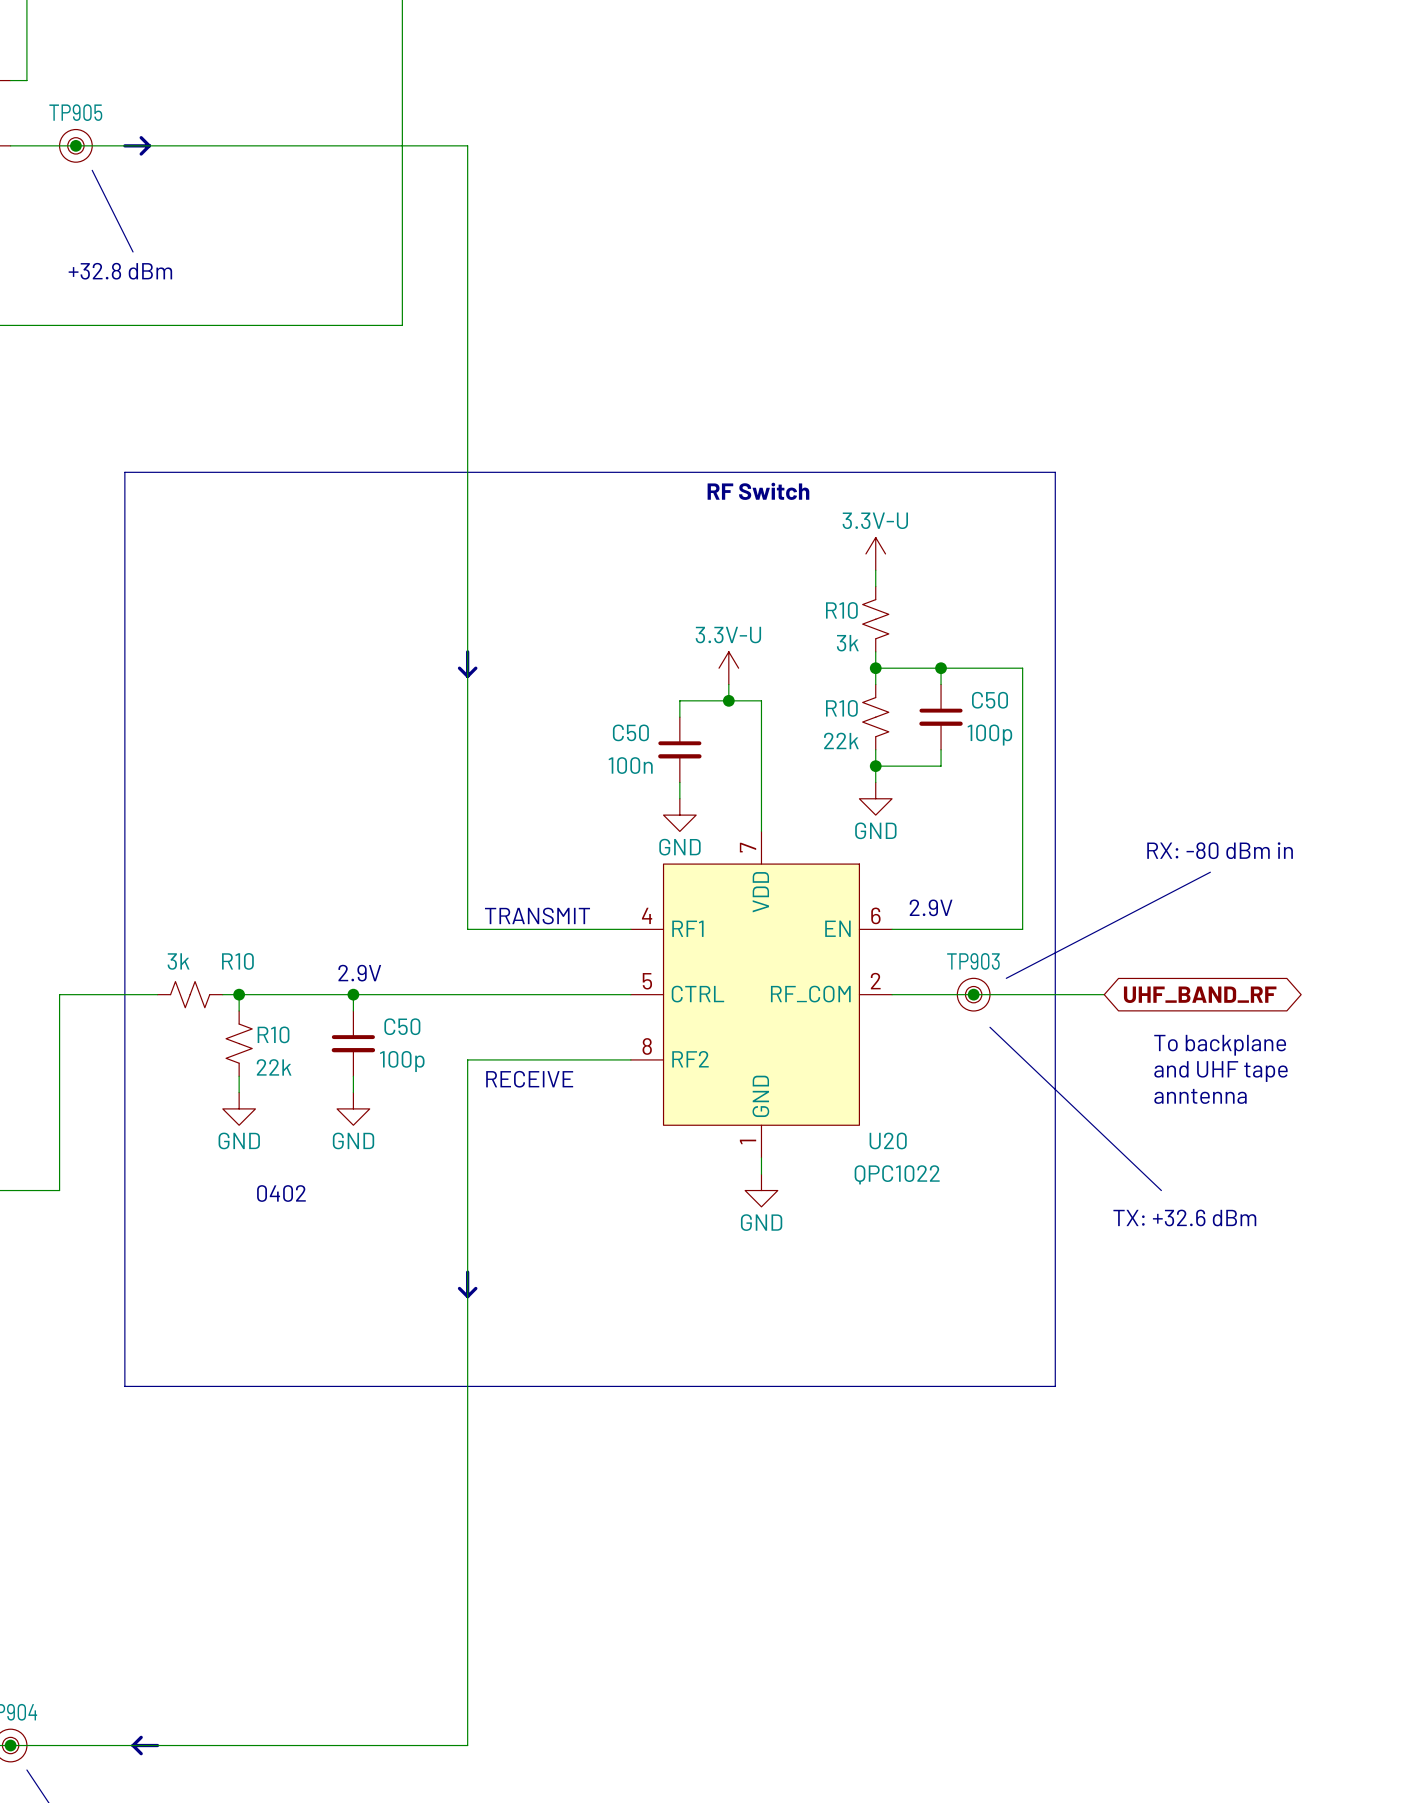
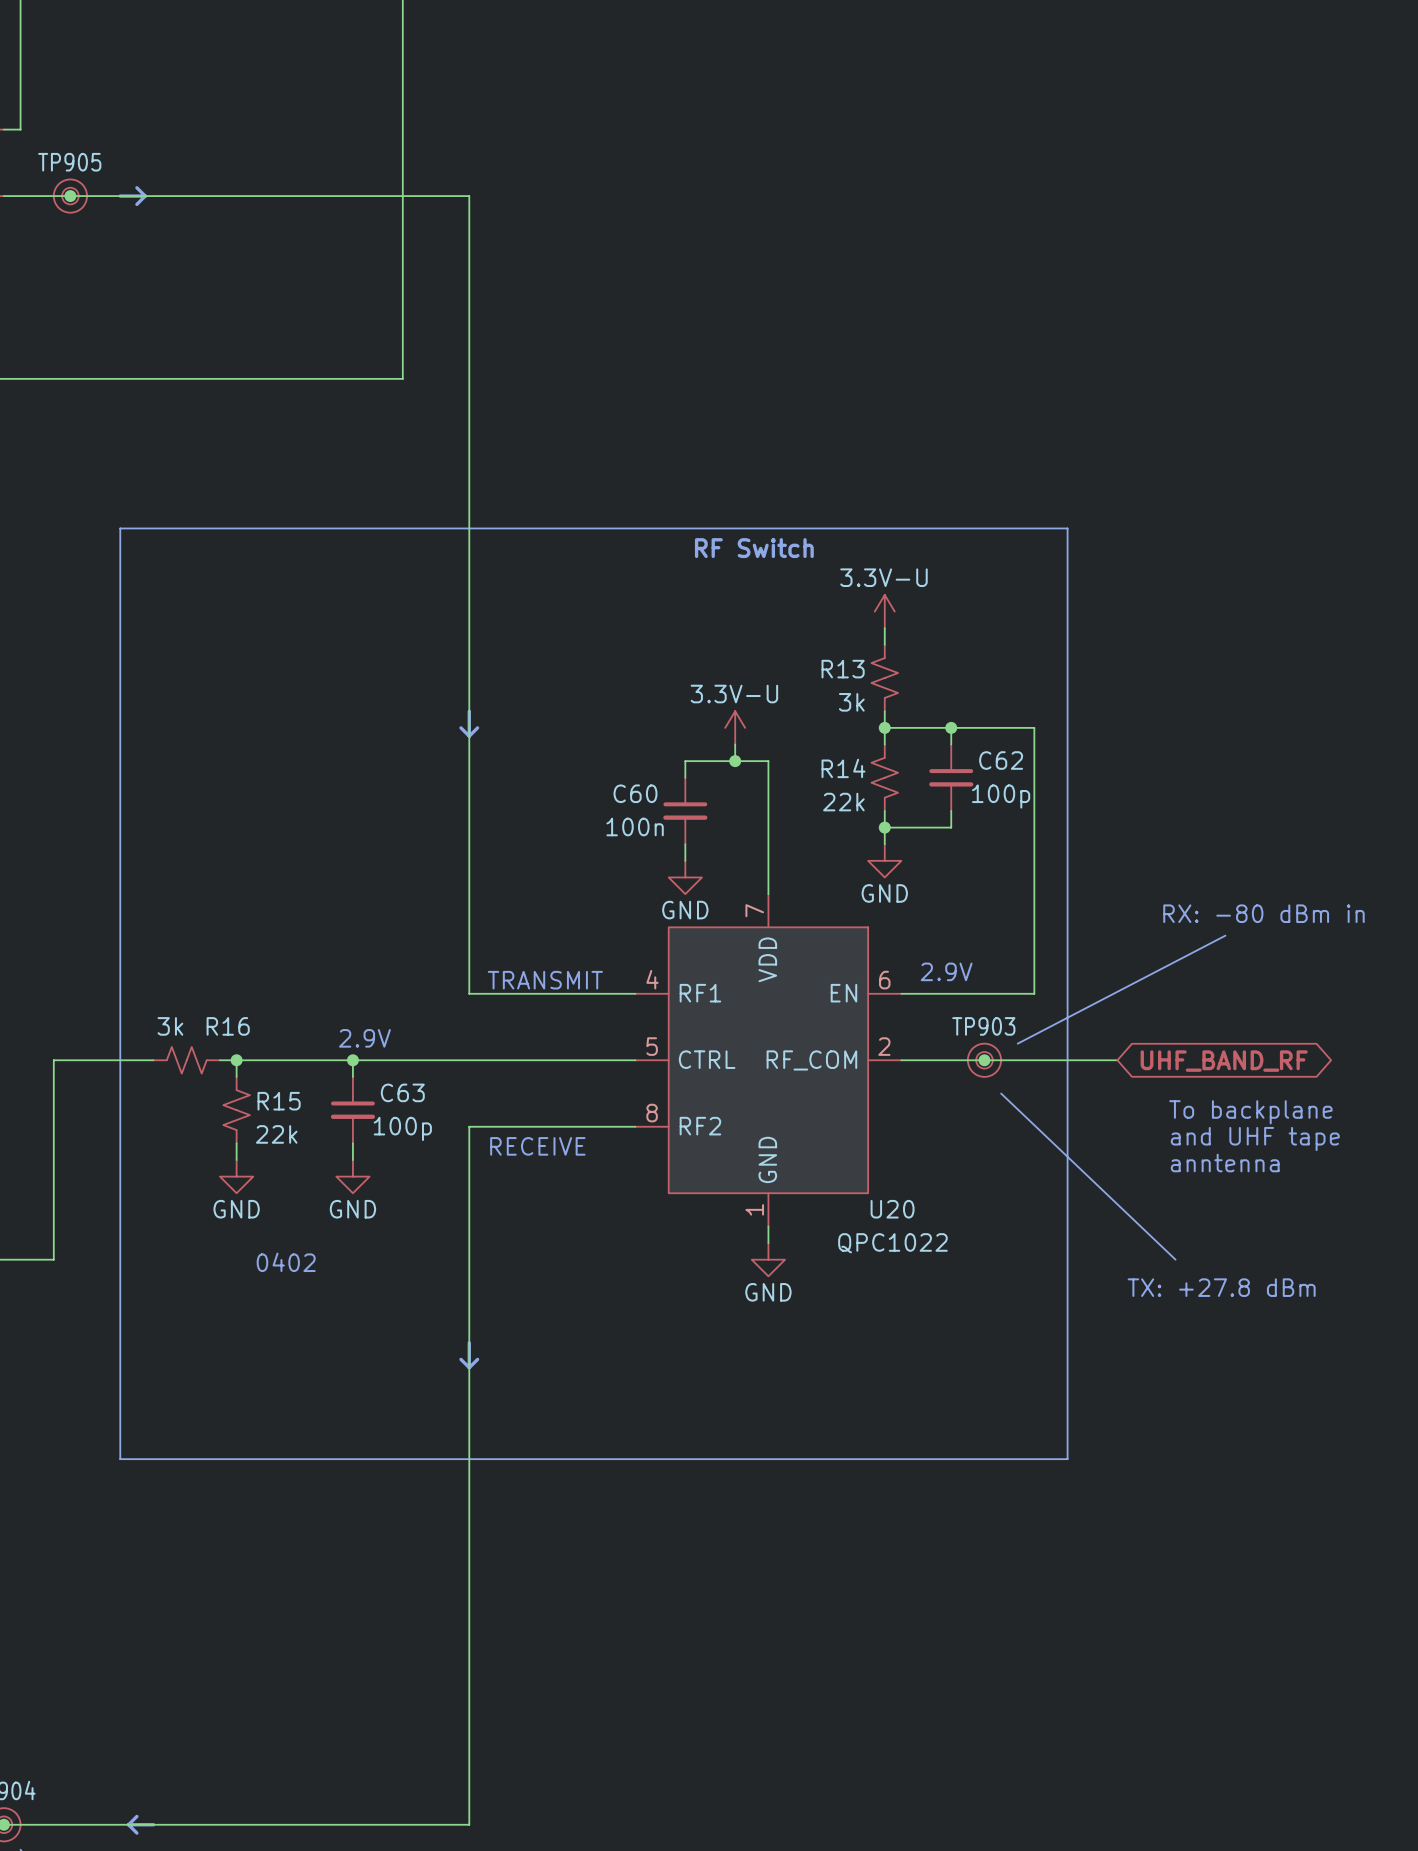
line: (92, 170) (133, 251) -> none
text: +32.8 dBm (120, 271) -> none
R10 name: R10 (841, 610) -> R13 (843, 669)
C50 name: C50 (990, 700) -> C62 (1001, 760)
R10 name: R10 (841, 708) -> R14 (843, 768)
C50 name: C50 (630, 732) -> C60 (635, 793)
R10 name: R10 (237, 961) -> R16 (228, 1026)
C50 name: C50 (402, 1026) -> C63 (402, 1092)
R10 name: R10 (273, 1034) -> R15 (279, 1101)
text: TX: +32.6 dBm (1184, 1217) -> TX: +27.8 dBm (1221, 1287)

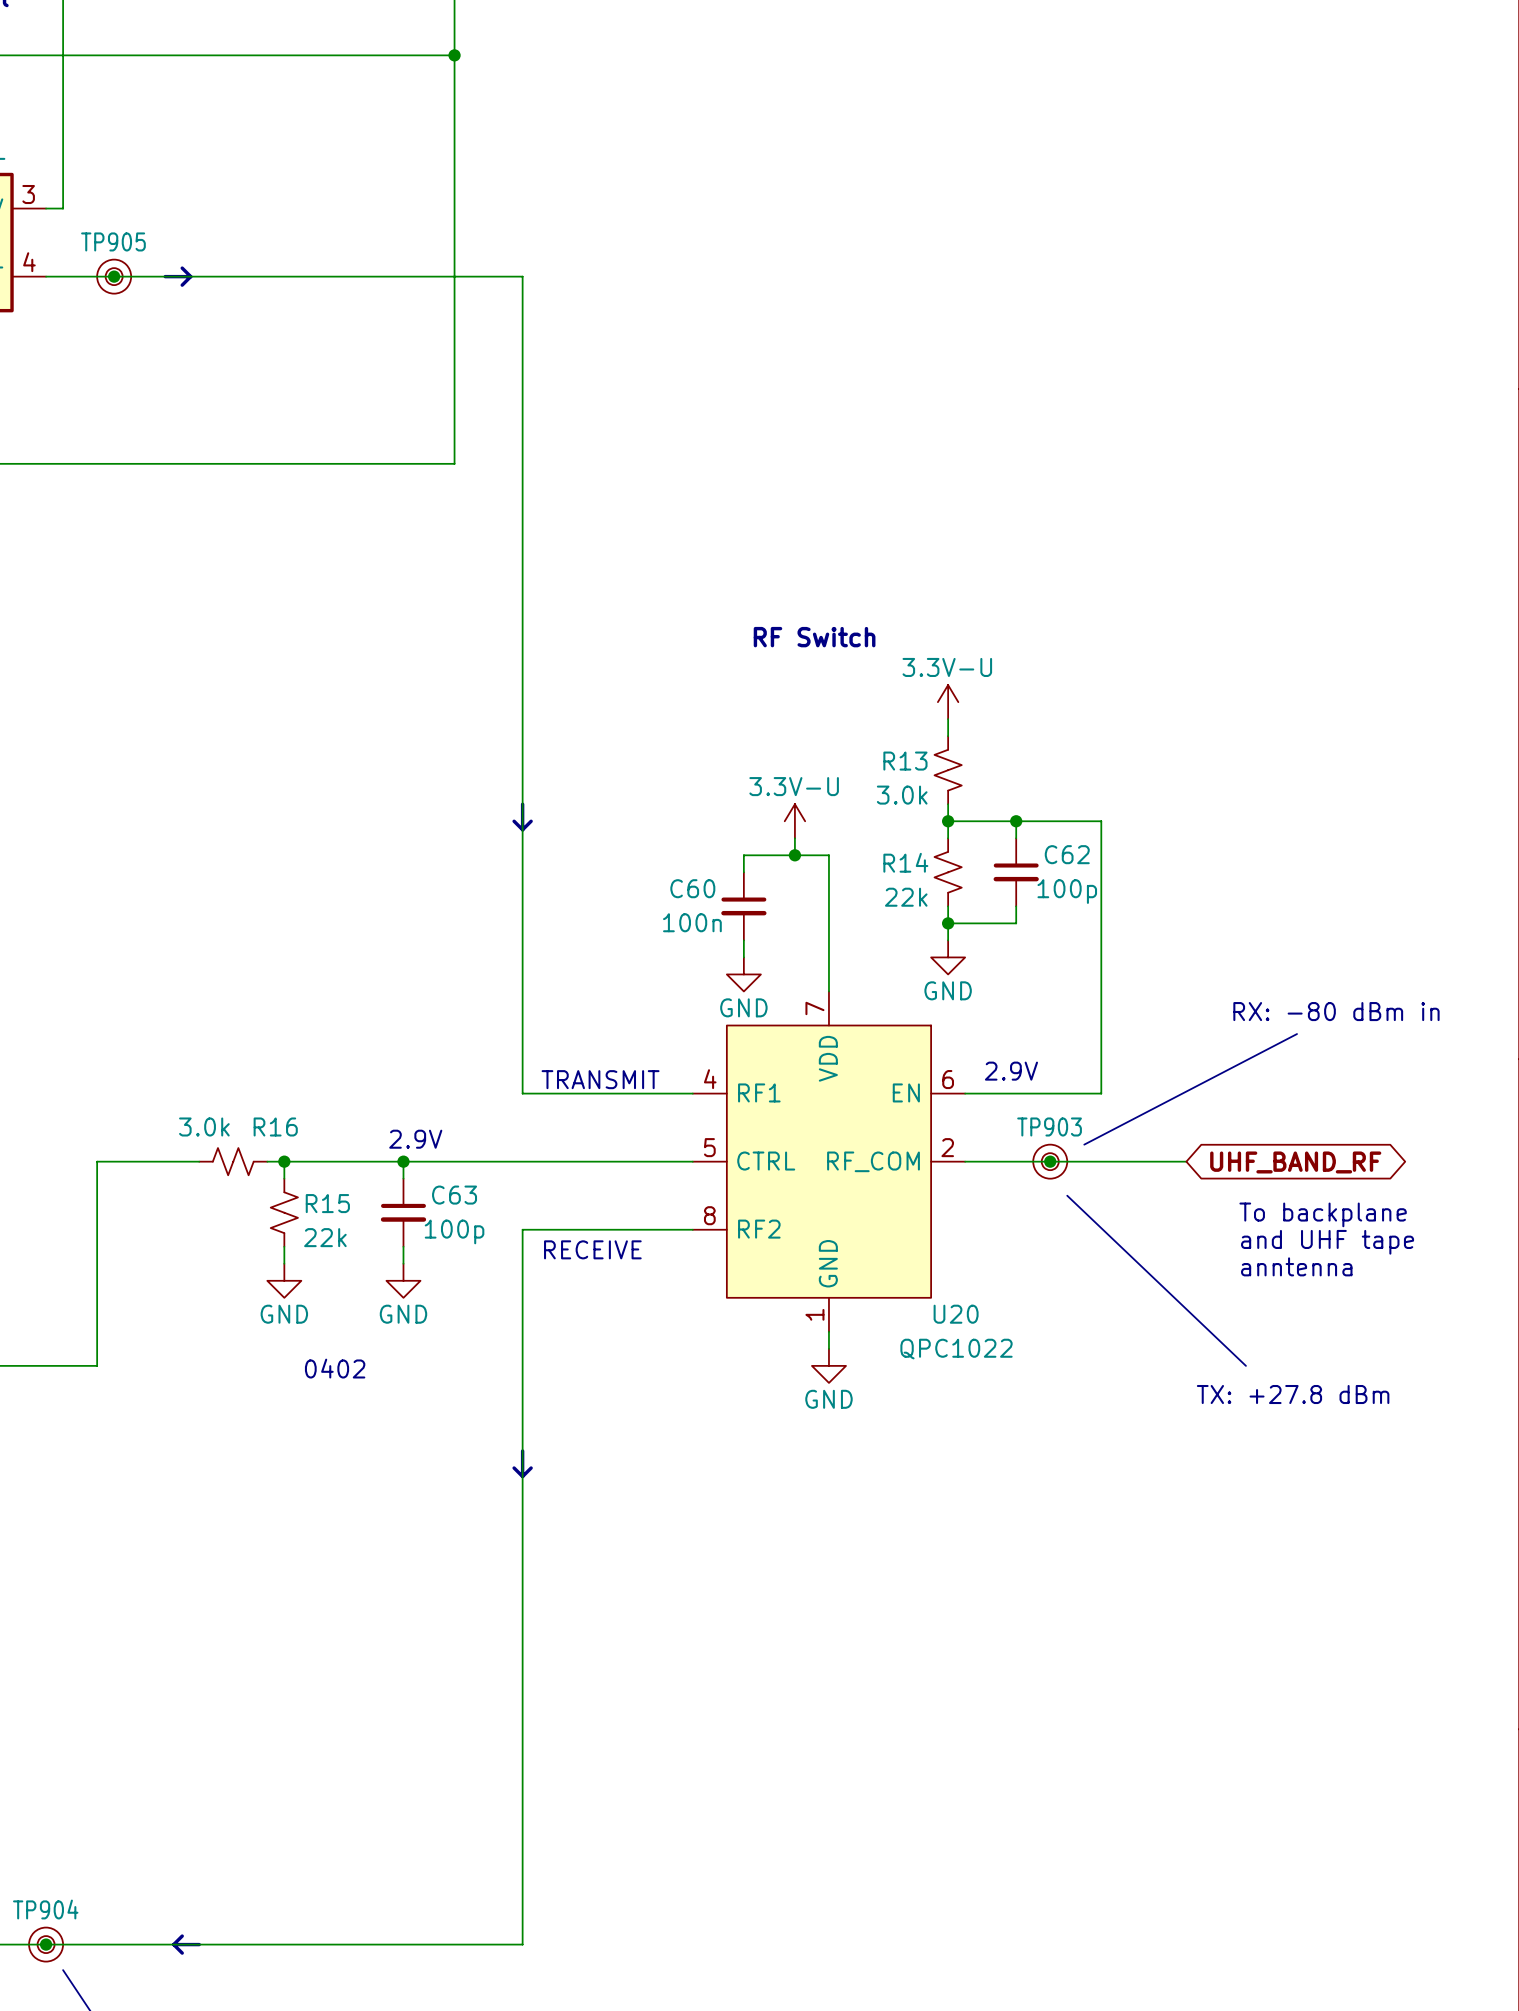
line: (120, 528) (1067, 528) (1067, 1459) (120, 1459) (120, 528) -> none
R13 value: 3k (851, 702) -> 3.0k (902, 795)
R16 value: 3k (170, 1026) -> 3.0k (204, 1126)

